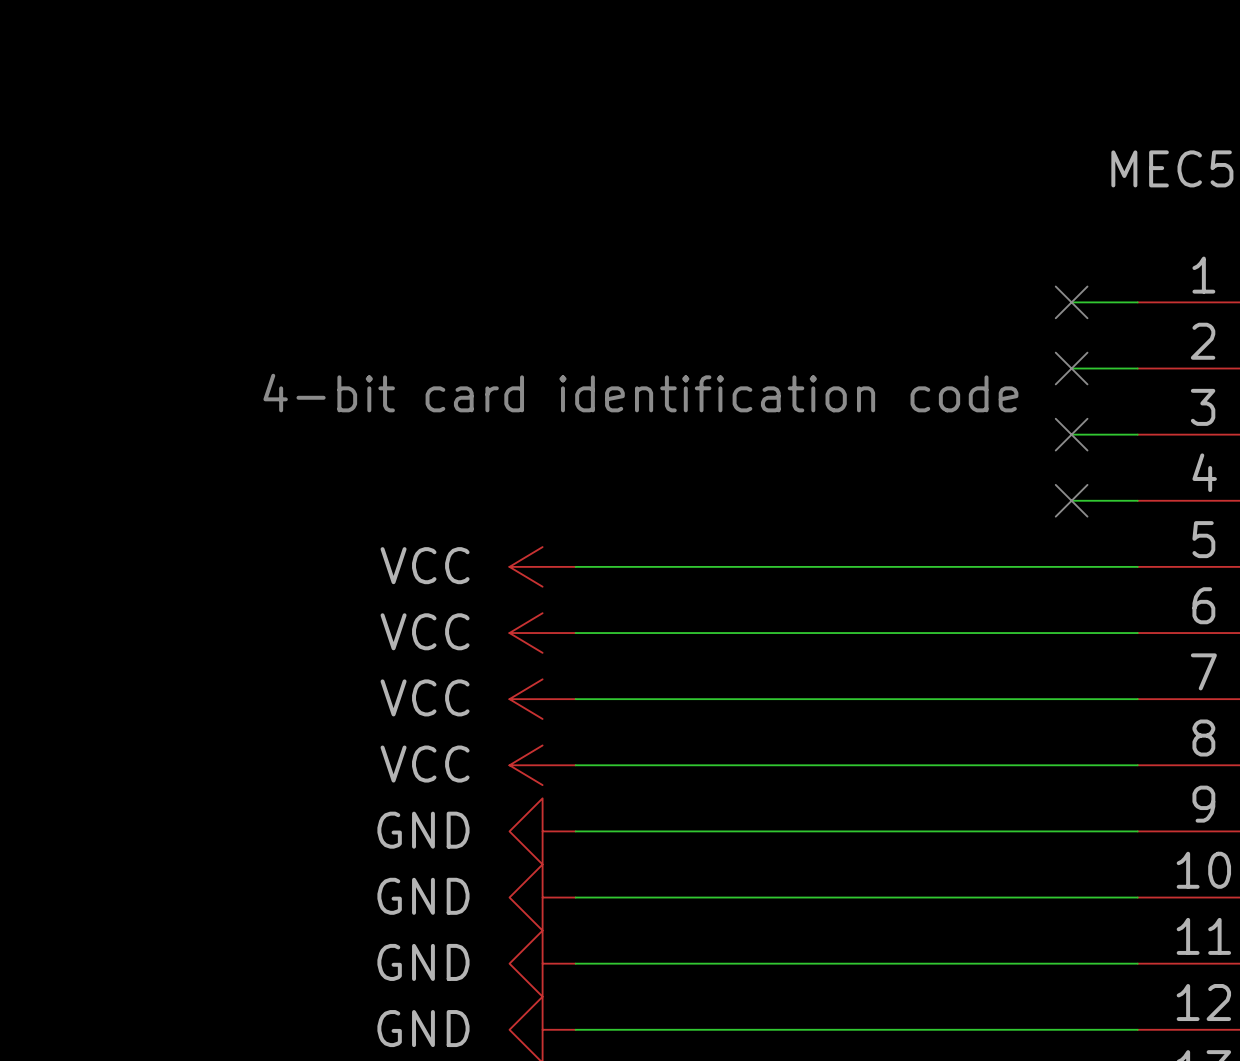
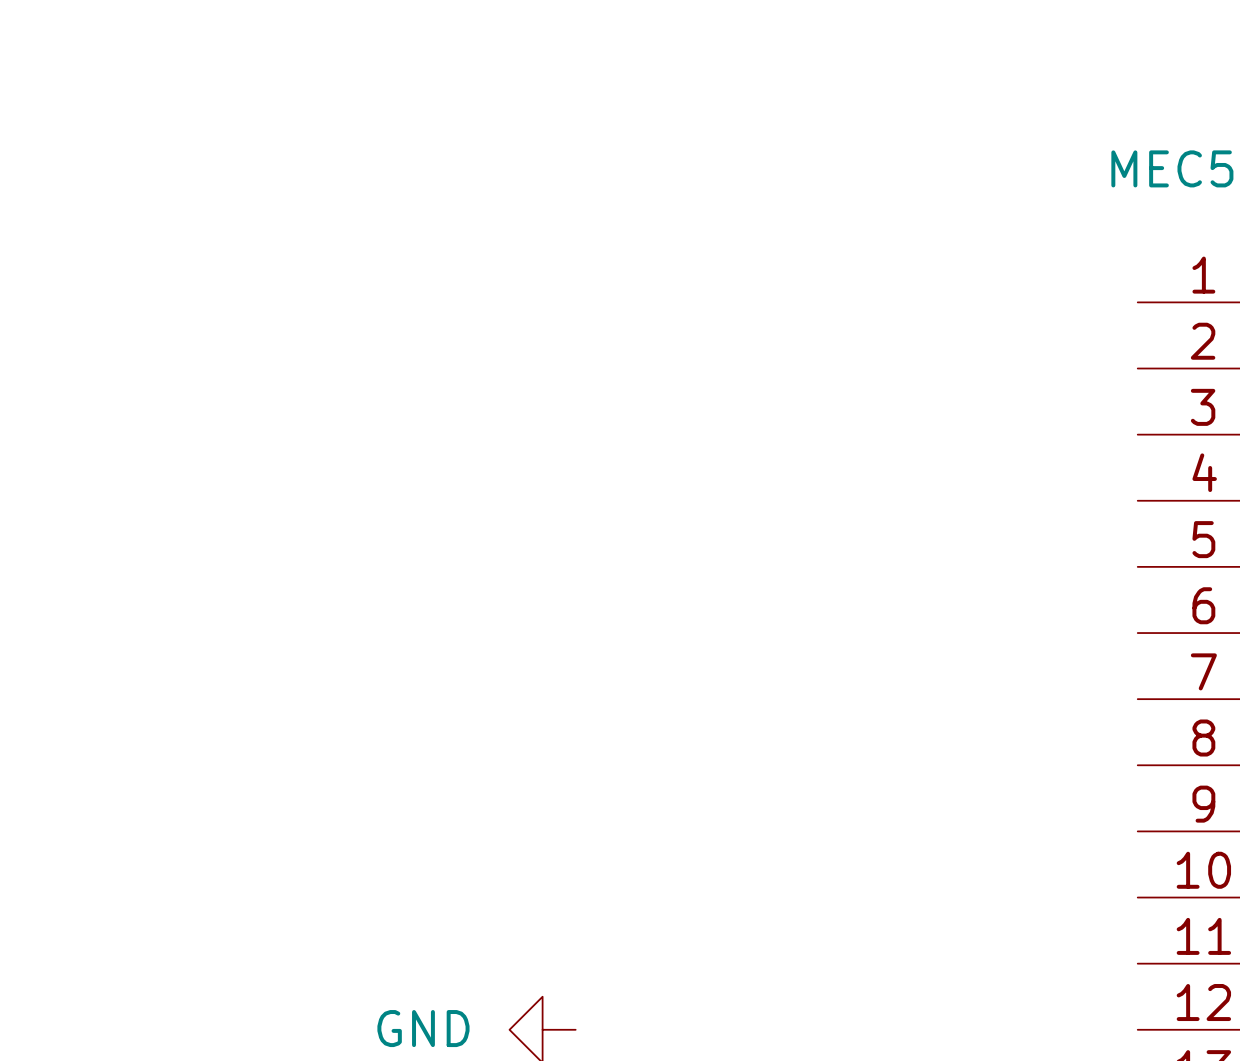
wire: (1071, 302) (1137, 302) -> none
no-connect mark: (1071, 302) -> none
wire: (1071, 368) (1137, 368) -> none
no-connect mark: (1071, 368) -> none
text: 4-bit card identification code (640, 393) -> none
wire: (1071, 434) (1137, 434) -> none
no-connect mark: (1071, 434) -> none
wire: (1071, 500) (1137, 500) -> none
no-connect mark: (1071, 500) -> none
power symbol: VCC (542, 566) -> none
wire: (575, 566) (1137, 566) -> none
power symbol: VCC (542, 633) -> none
wire: (575, 633) (1137, 633) -> none
power symbol: VCC (542, 699) -> none
wire: (575, 699) (1137, 699) -> none
power symbol: VCC (542, 765) -> none
wire: (575, 765) (1137, 765) -> none
power symbol: GND (542, 831) -> none
wire: (575, 831) (1137, 831) -> none
power symbol: GND (542, 897) -> none
wire: (575, 897) (1137, 897) -> none
power symbol: GND (542, 963) -> none
wire: (575, 963) (1137, 963) -> none
wire: (575, 1029) (1137, 1029) -> none

